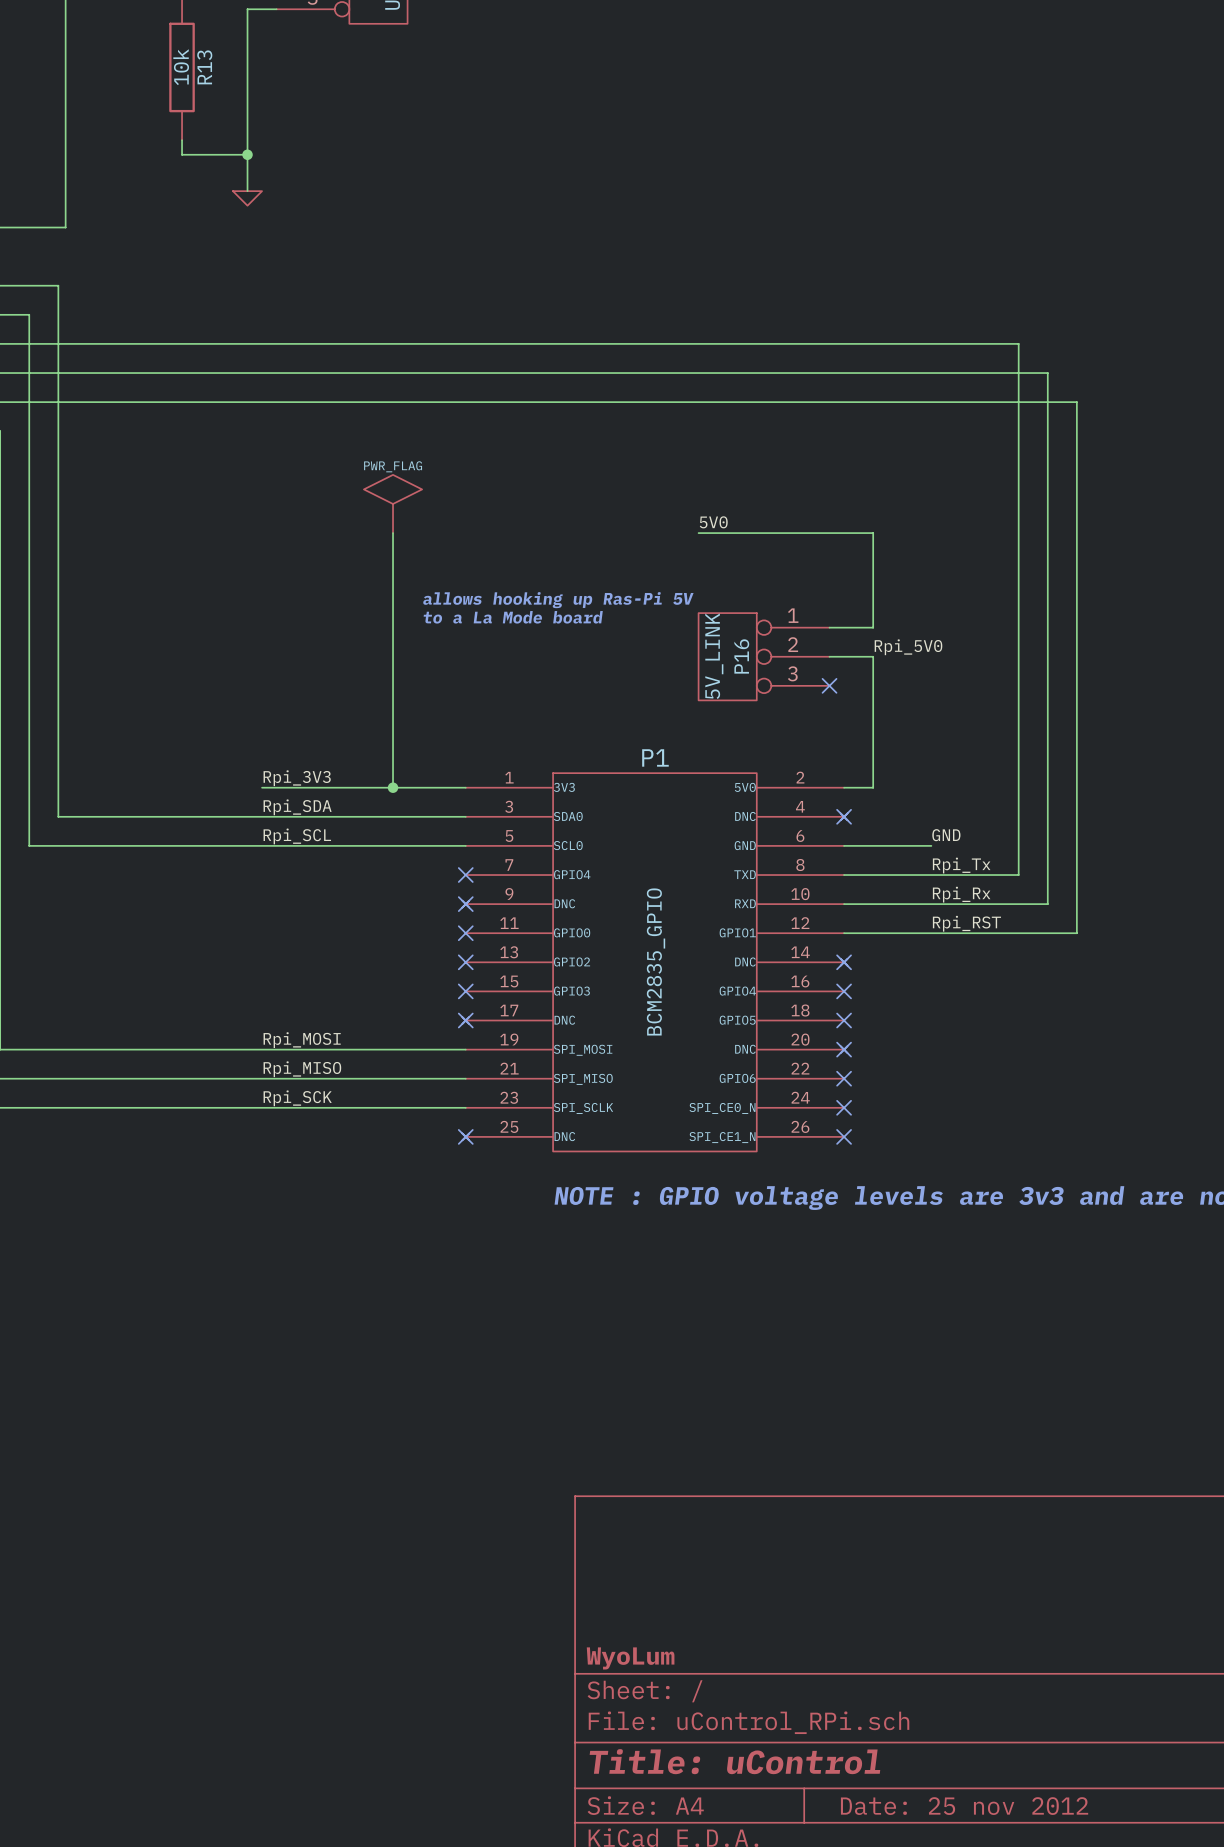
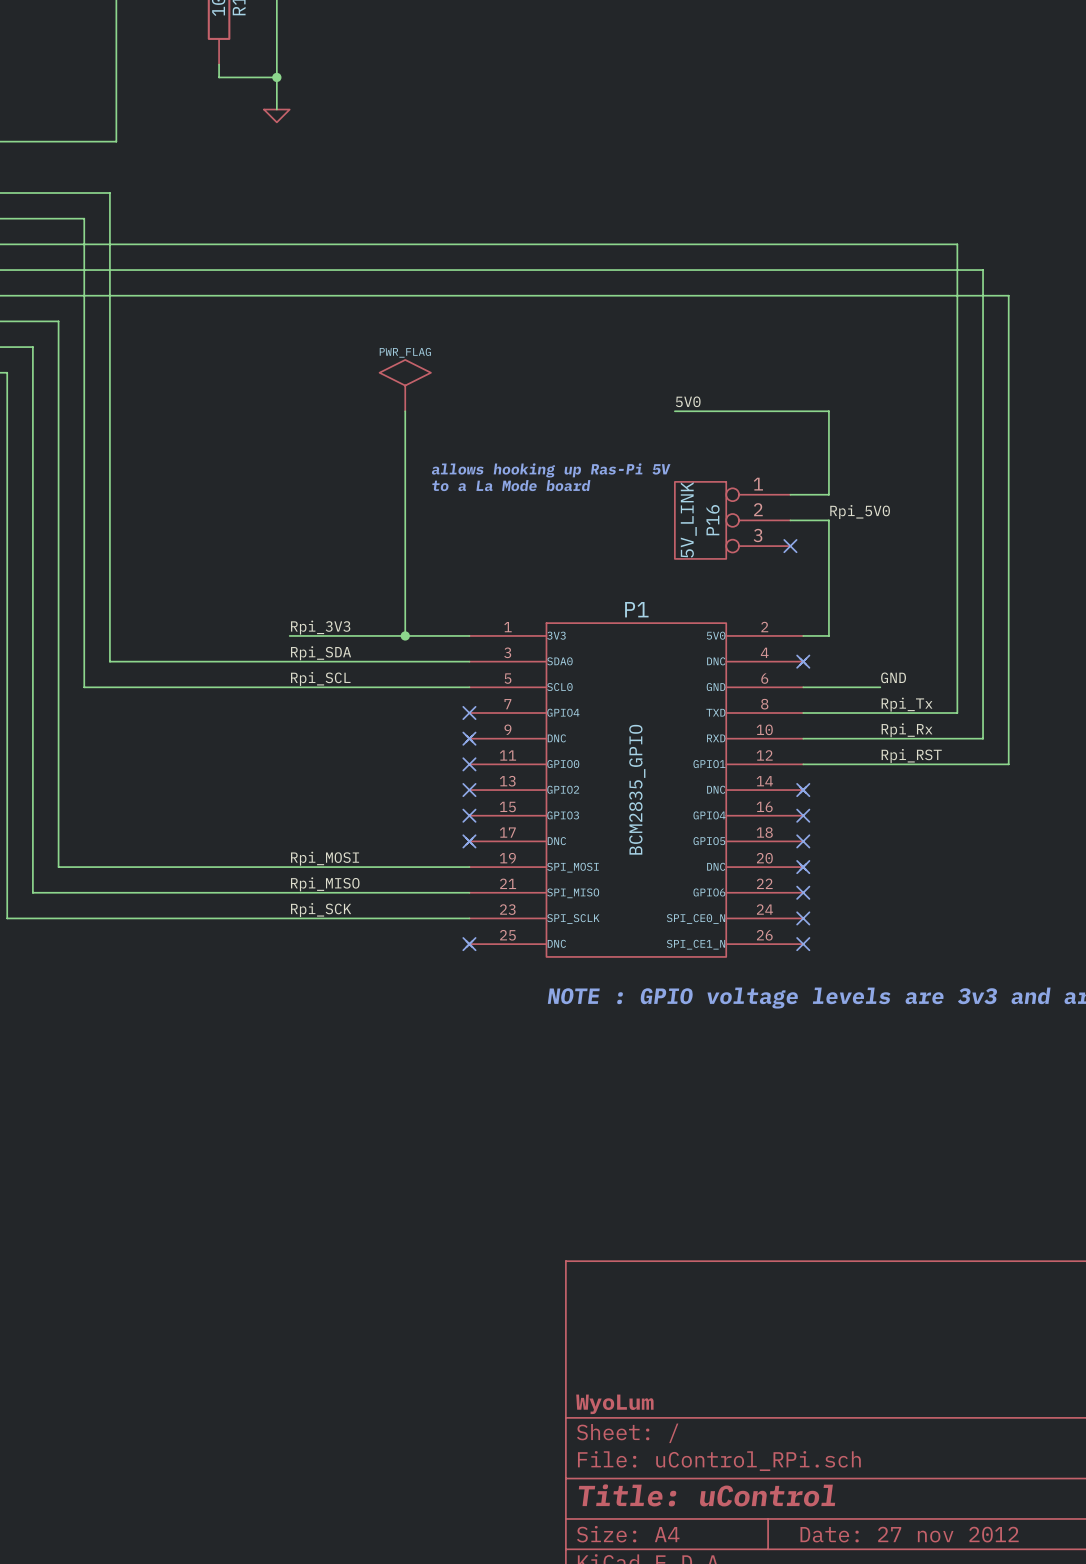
title block: Date: 25 nov 2012 (964, 1806) -> Date: 27 nov 2012 (909, 1534)

